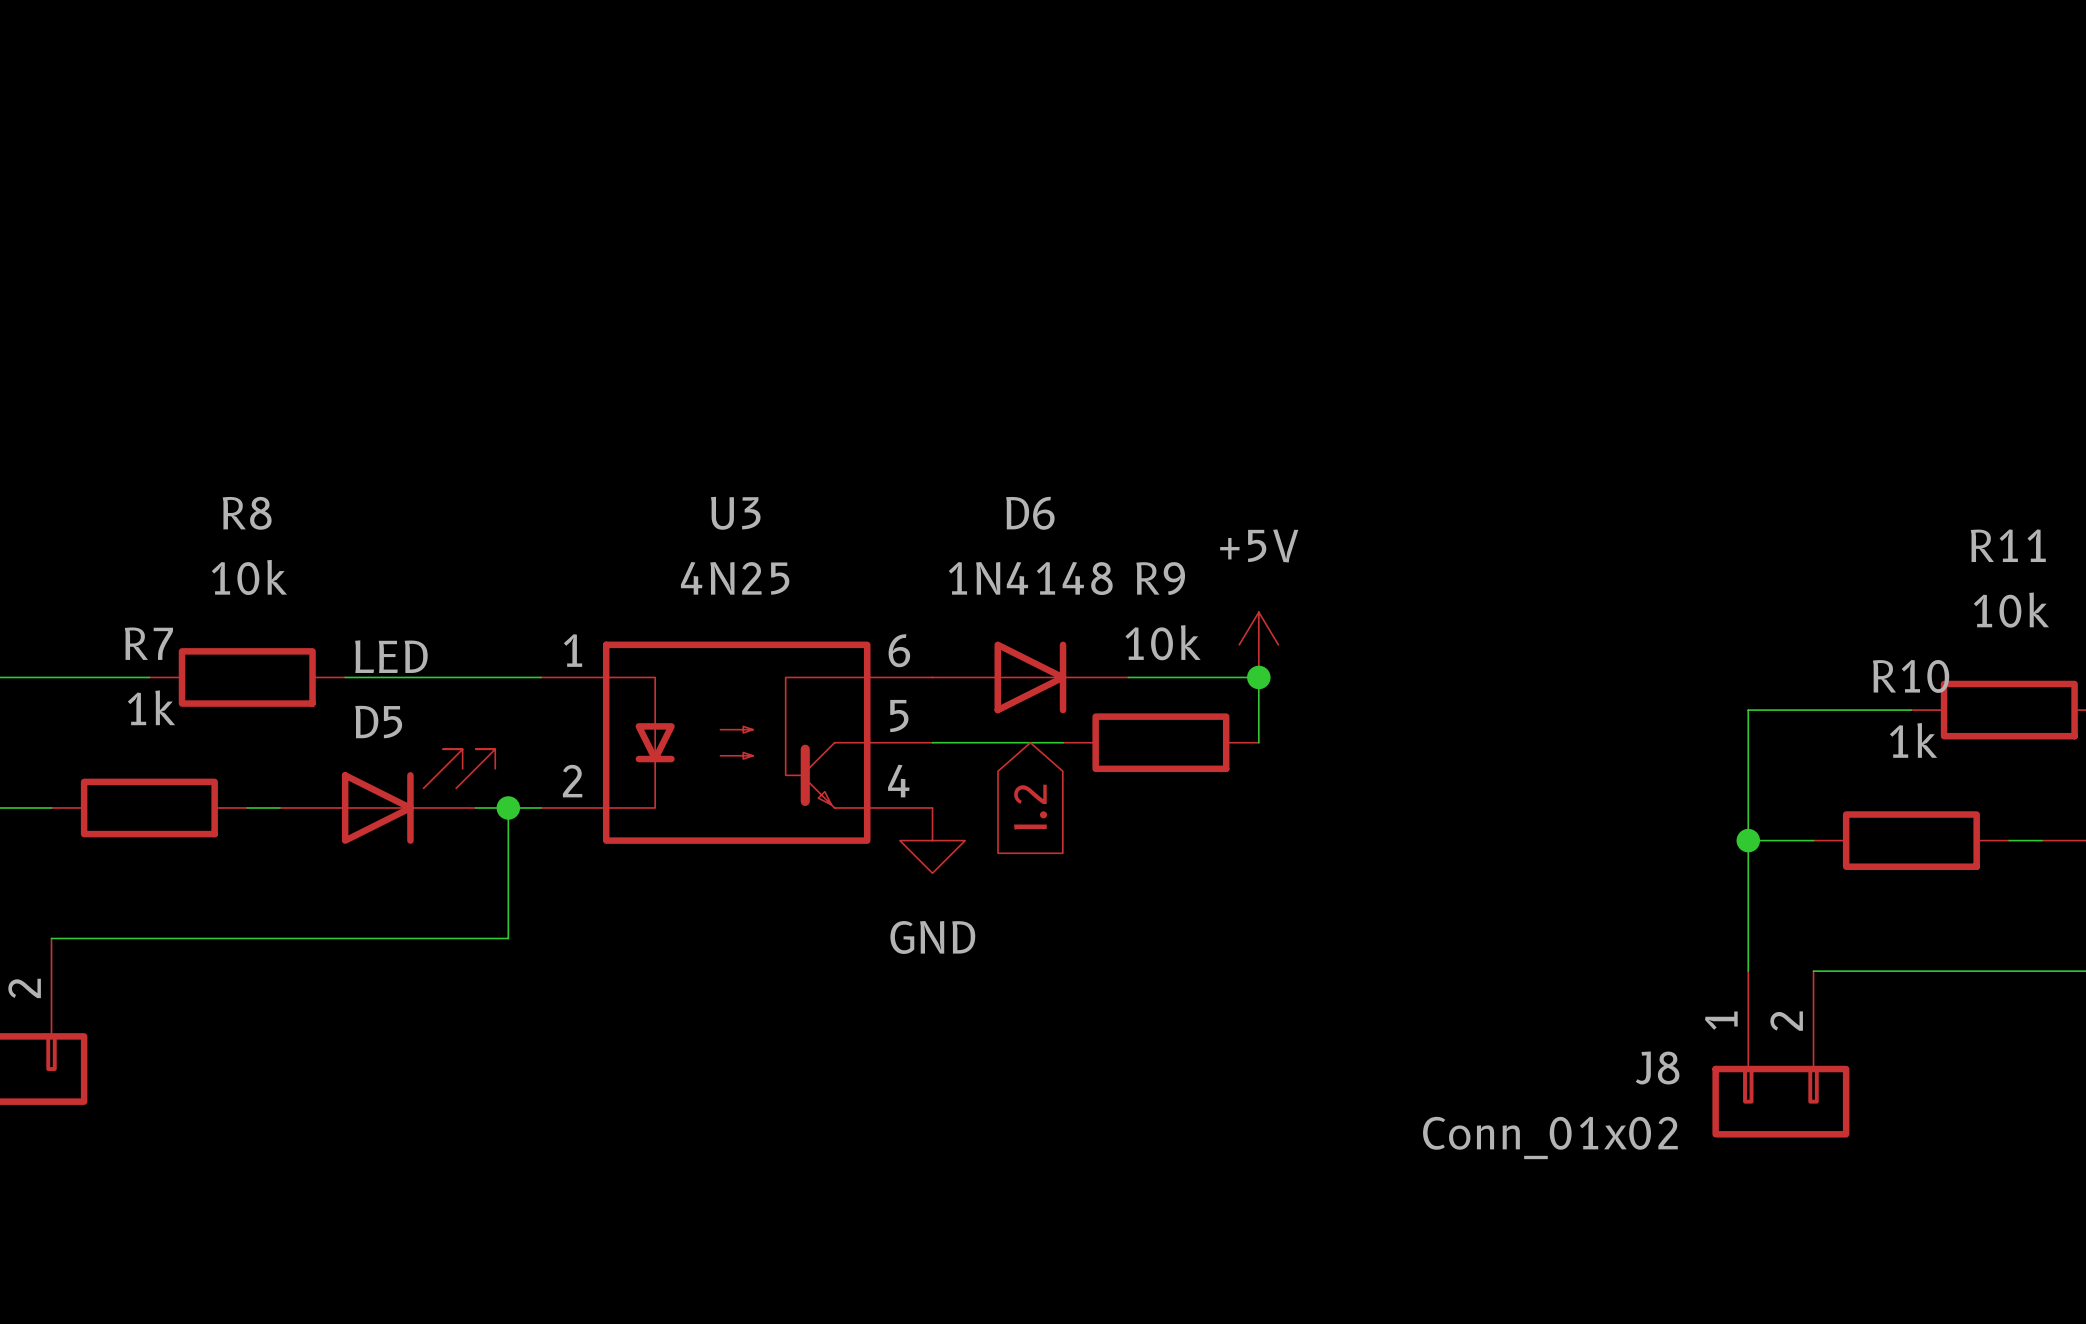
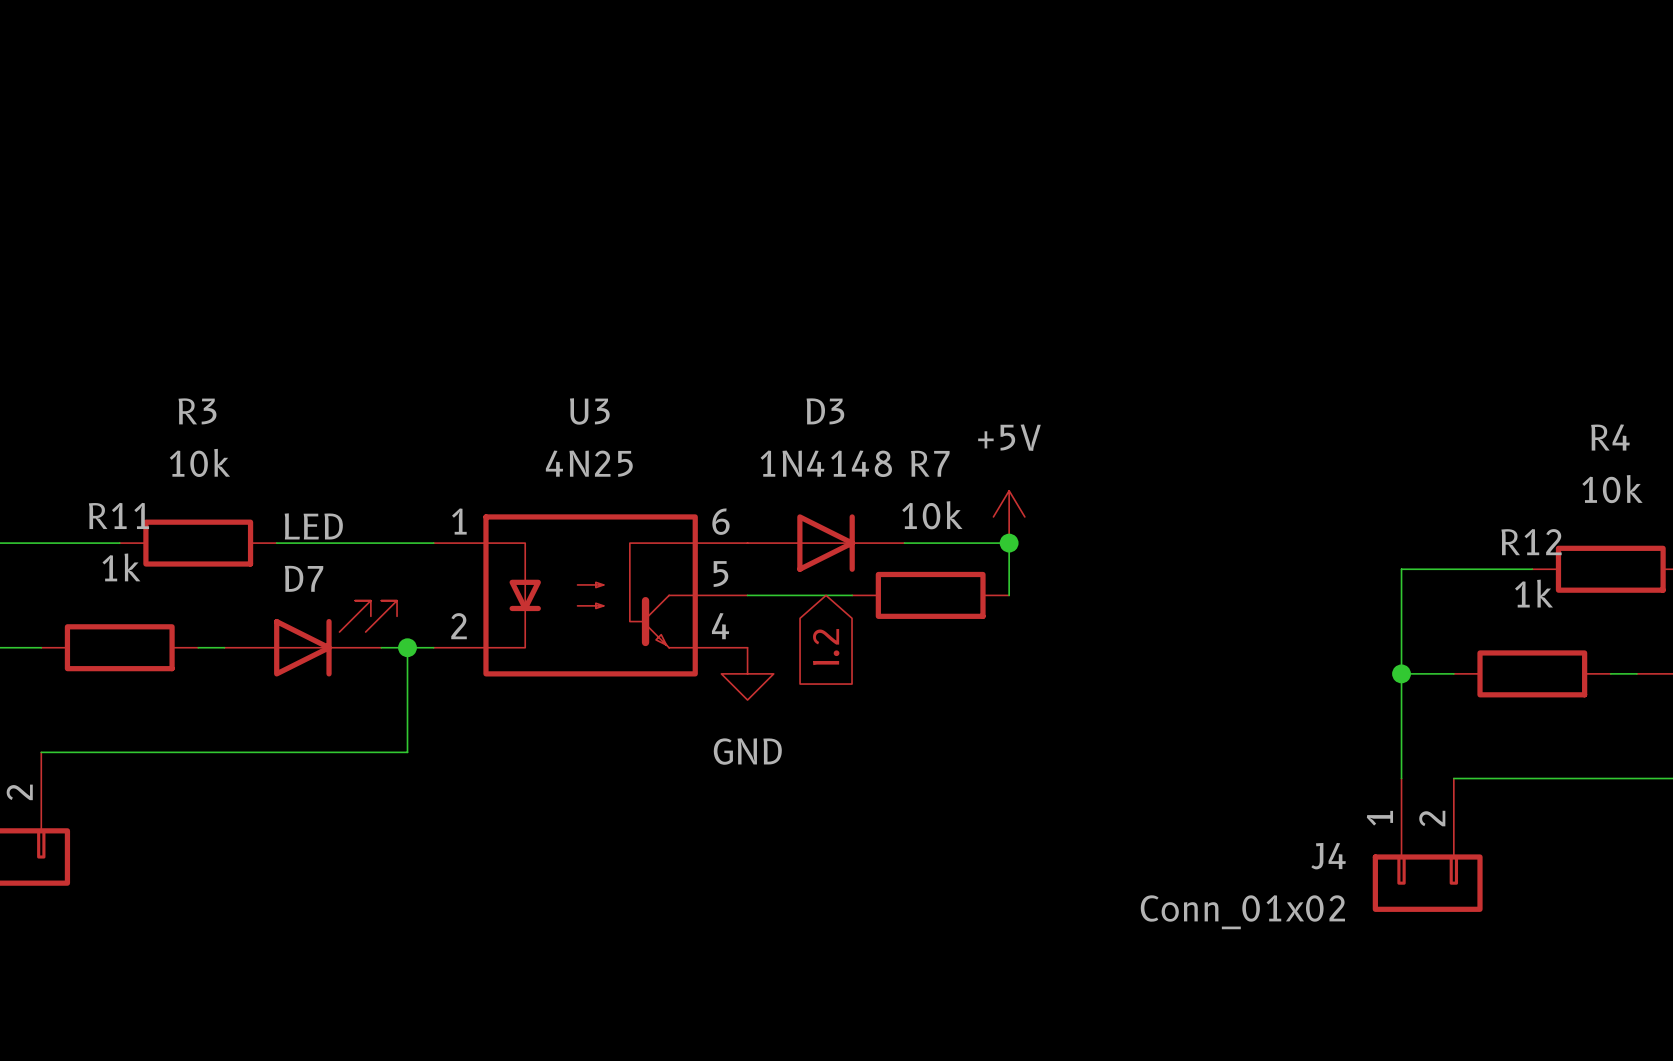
R8 name: R8 (247, 513) -> R3 (197, 411)
D6 name: D6 (1030, 513) -> D3 (825, 411)
R11 name: R11 (2008, 545) -> R4 (1610, 437)
R9 name: R9 (1160, 578) -> R7 (930, 463)
R7 name: R7 (148, 643) -> R11 (118, 515)
R10 name: R10 (1911, 676) -> R12 (1531, 542)
D5 name: D5 (378, 722) -> D7 (304, 578)
J8 name: J8 (1657, 1067) -> J4 (1328, 856)

